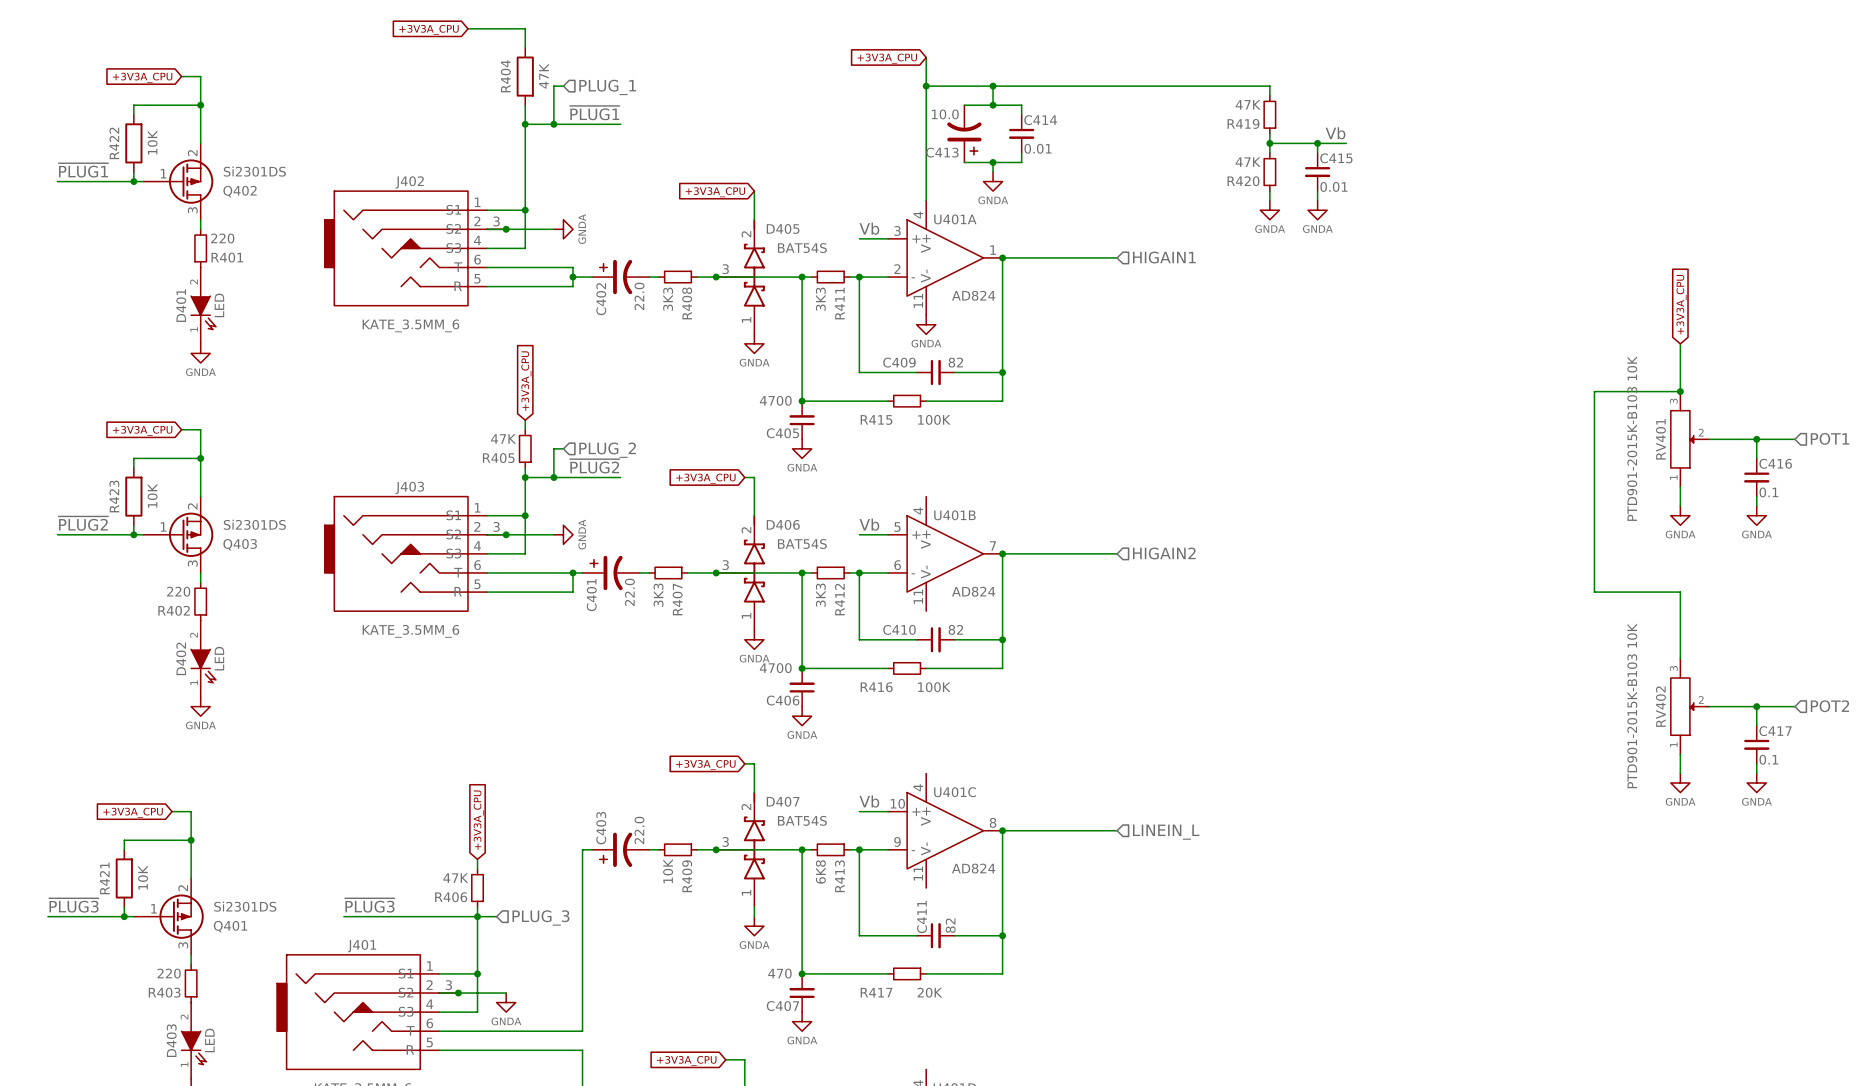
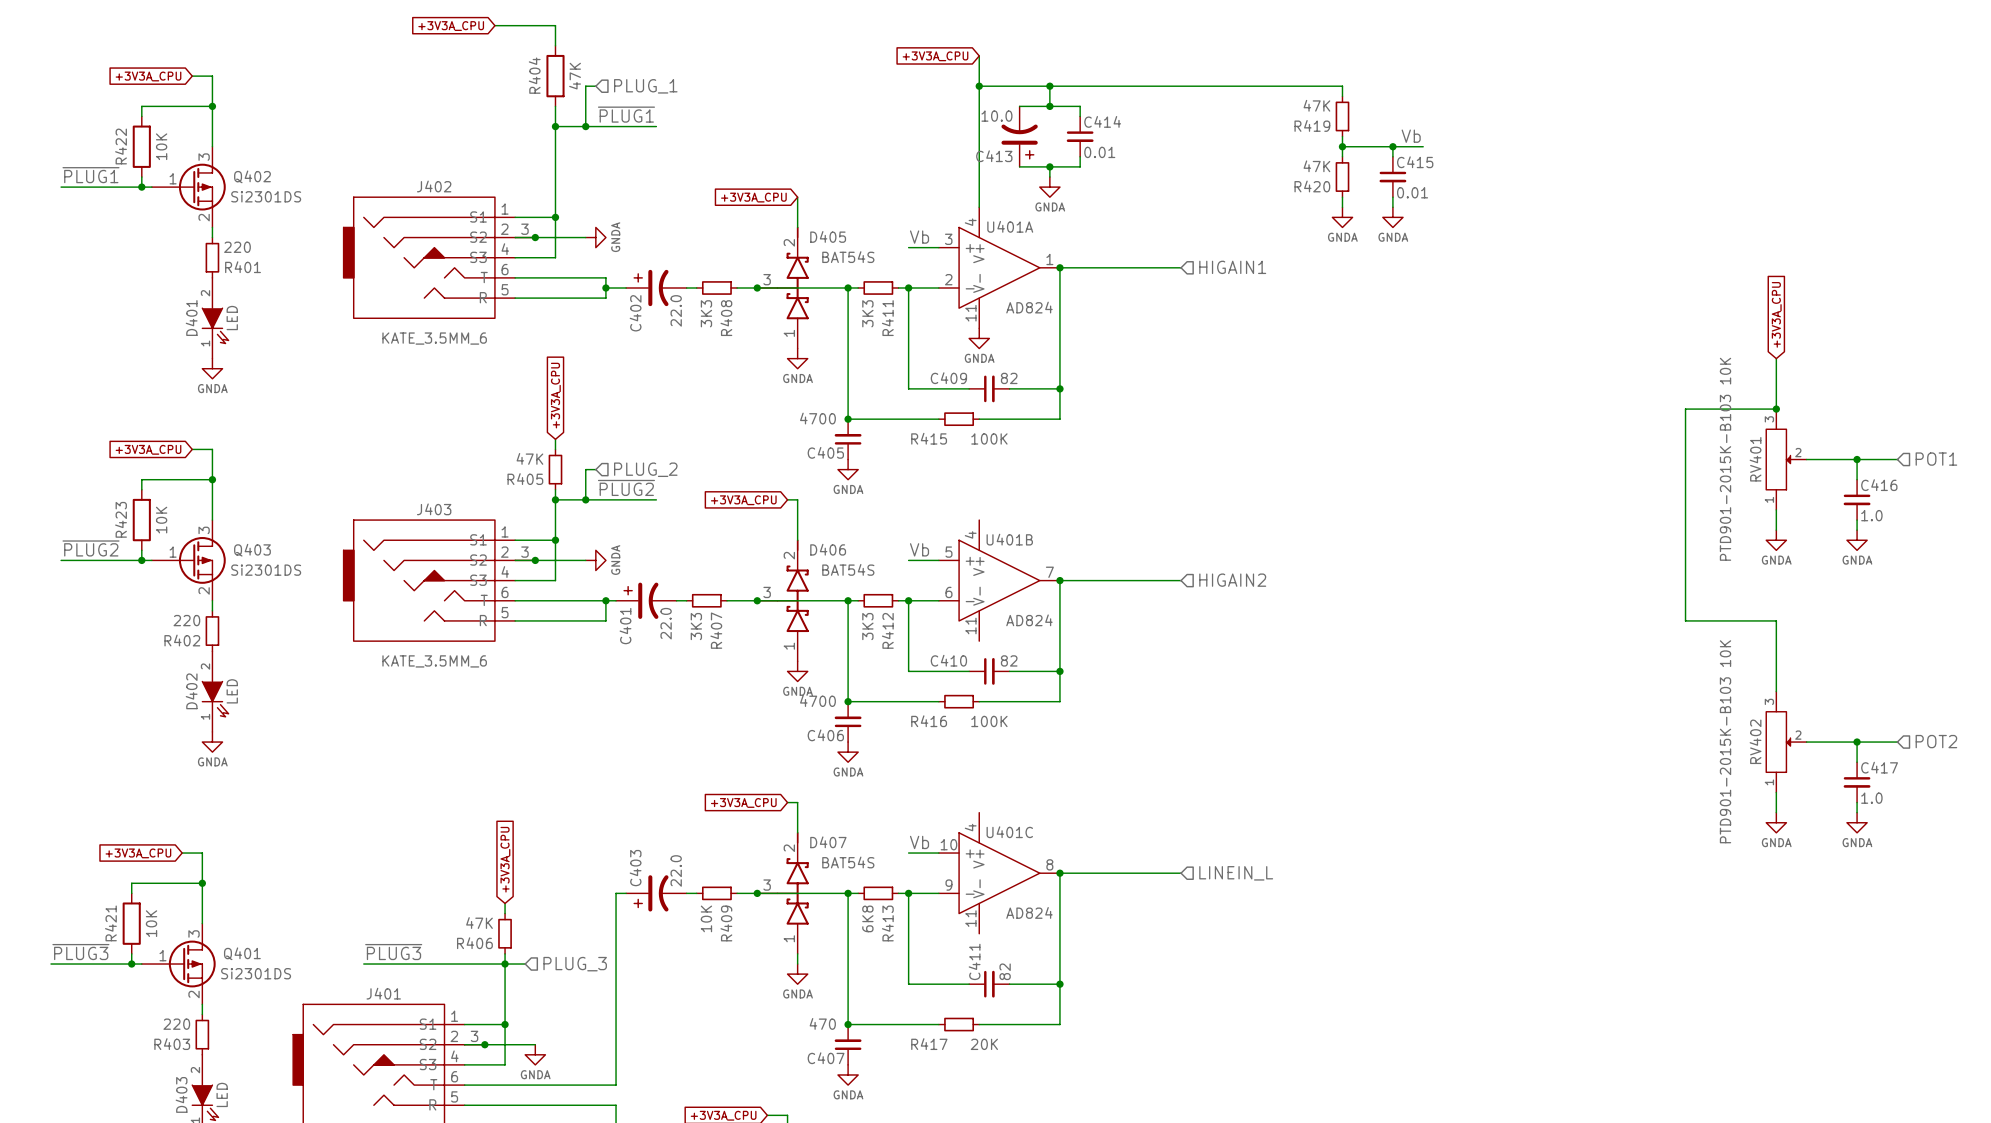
Q402 flip: as is (191, 181) -> up-down (202, 187)
C416 value: 0.1 (1768, 492) -> 1.0 (1871, 515)
Q403 flip: as is (191, 534) -> up-down (202, 560)
C417 value: 0.1 (1768, 759) -> 1.0 (1871, 798)
Q401 flip: as is (181, 916) -> up-down (192, 964)

